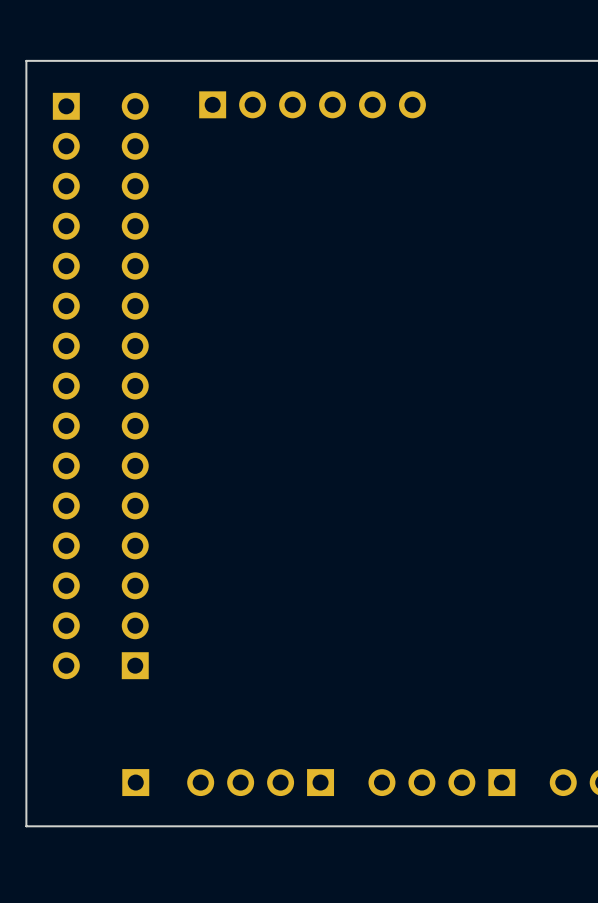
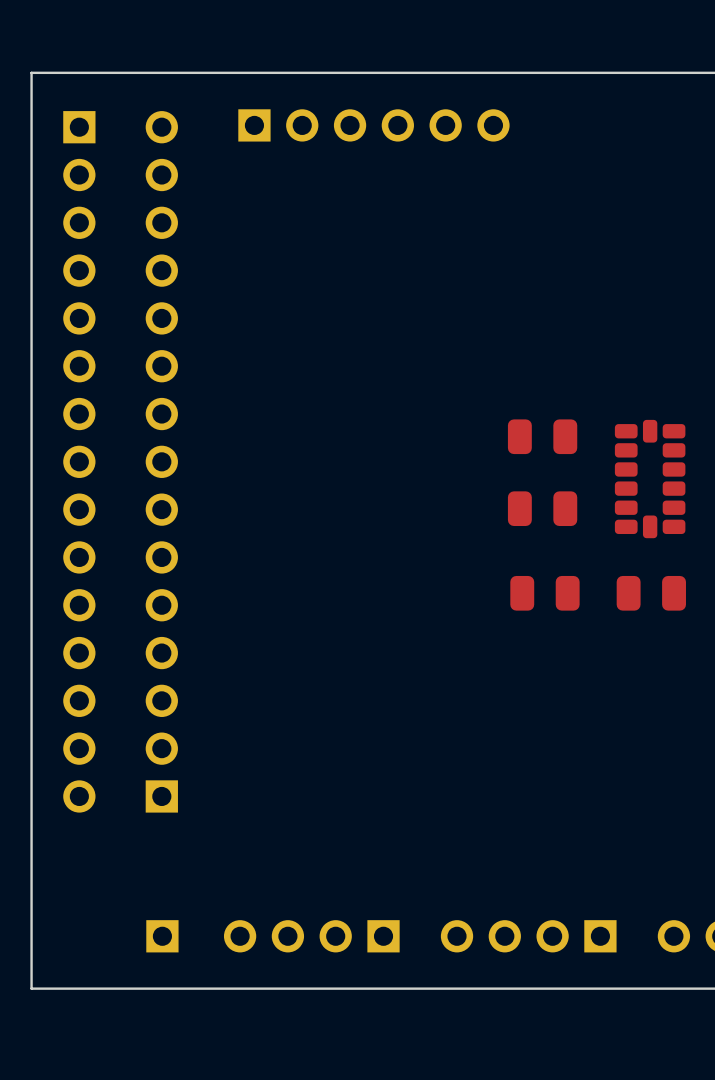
part: none -> (542, 436)
part: none -> (650, 479)
part: none -> (542, 508)
part: none -> (544, 593)
part: none -> (651, 593)

